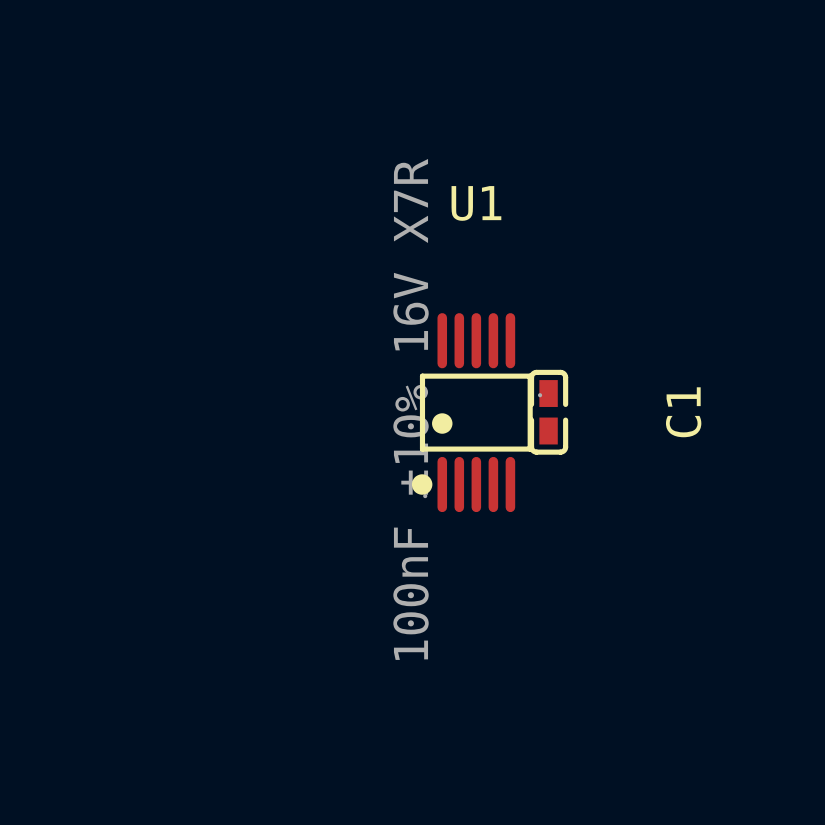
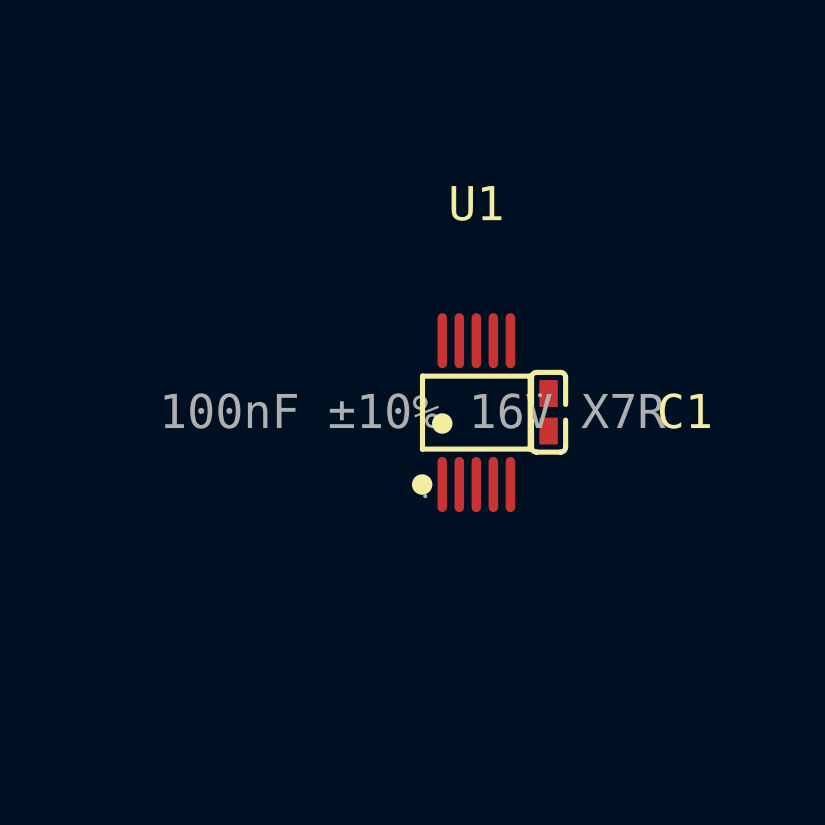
C1 value rotation: 0° (411, 409) -> 90° clockwise (415, 411)
C1 name rotation: 0° (683, 412) -> 90° clockwise (684, 411)

